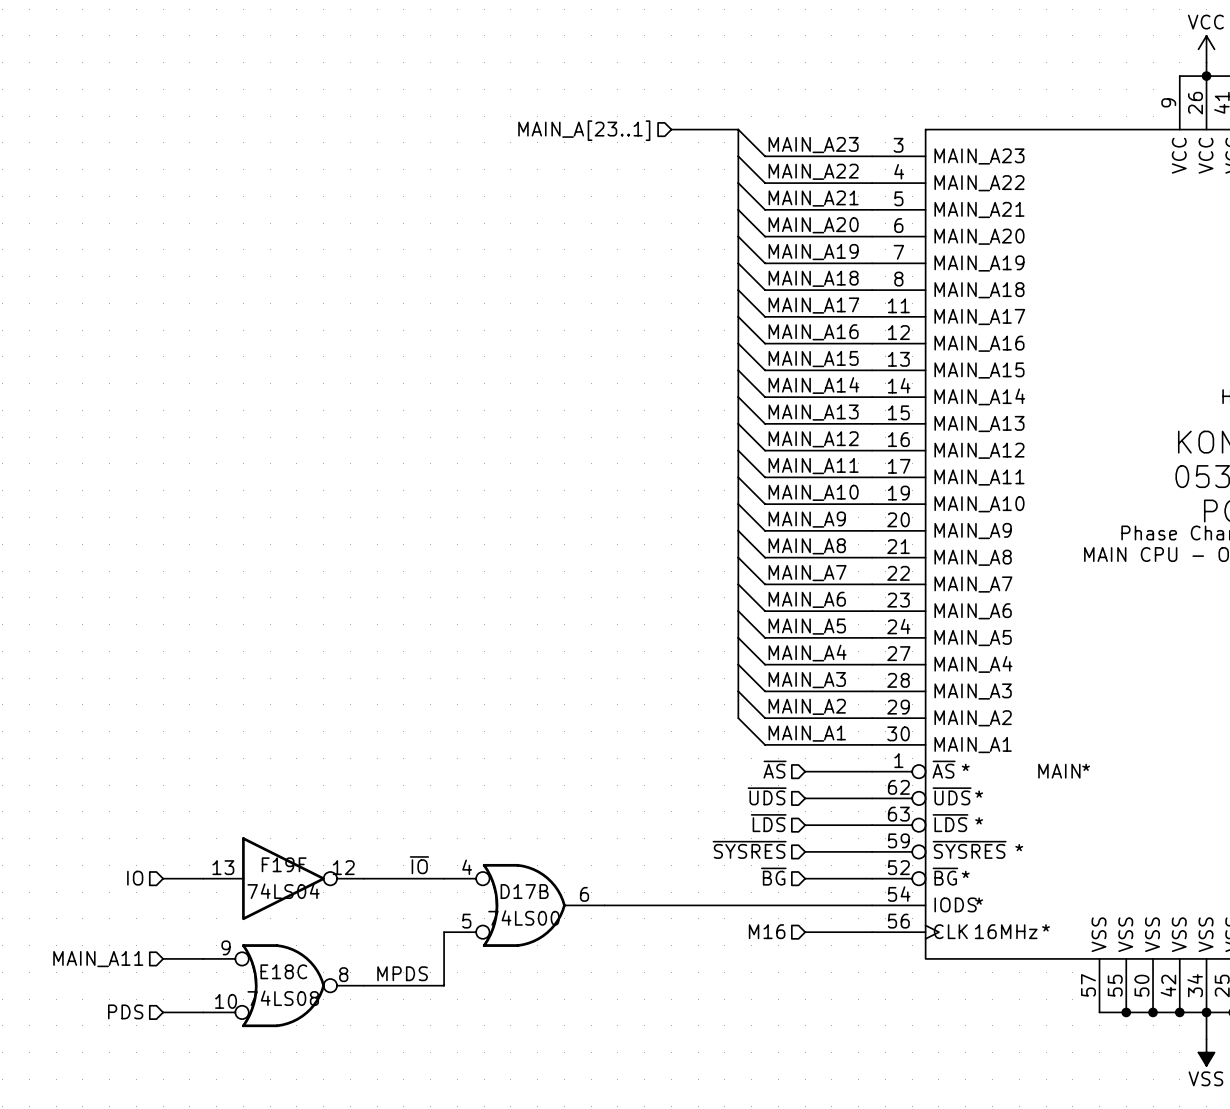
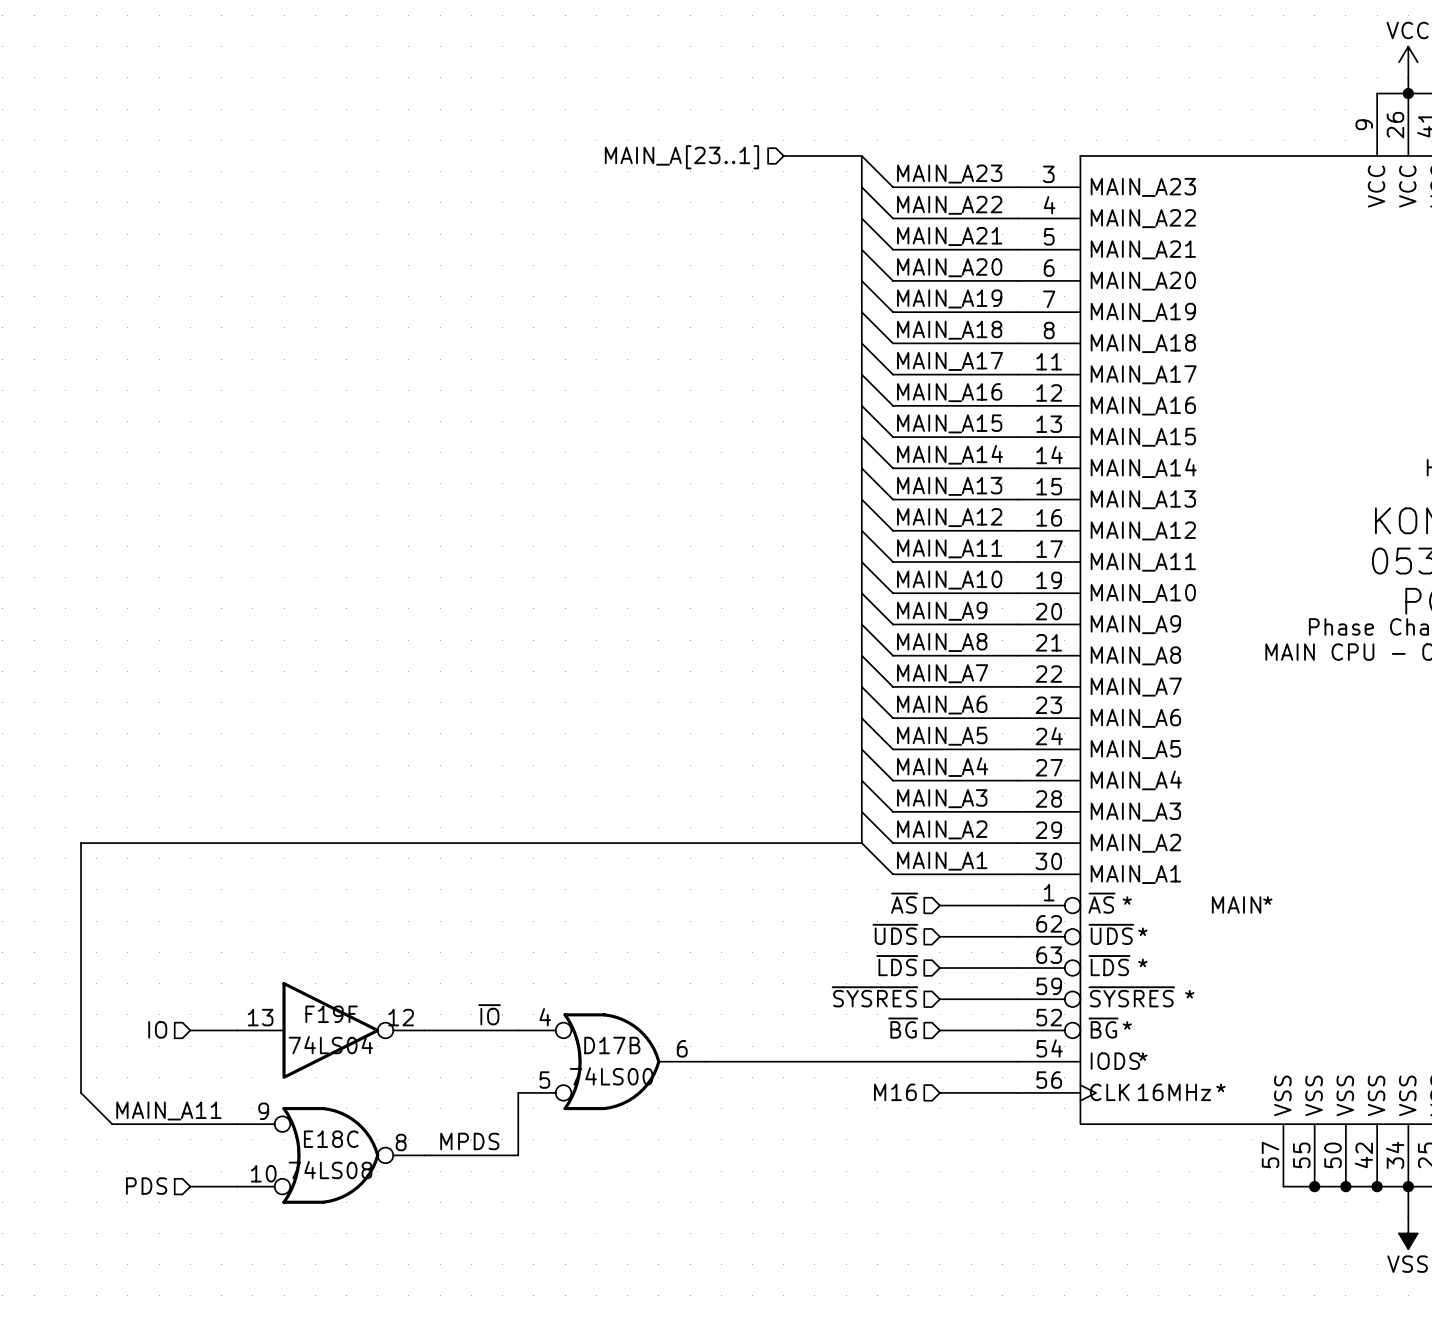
bus: none -> (861, 843) (81, 843) (81, 1092)
wire: none -> (81, 1092) (112, 1124) (190, 1124)
label: none -> MAIN_A11 (168, 1110)
hierarchical label: MAIN_A11 (98, 959) -> none

